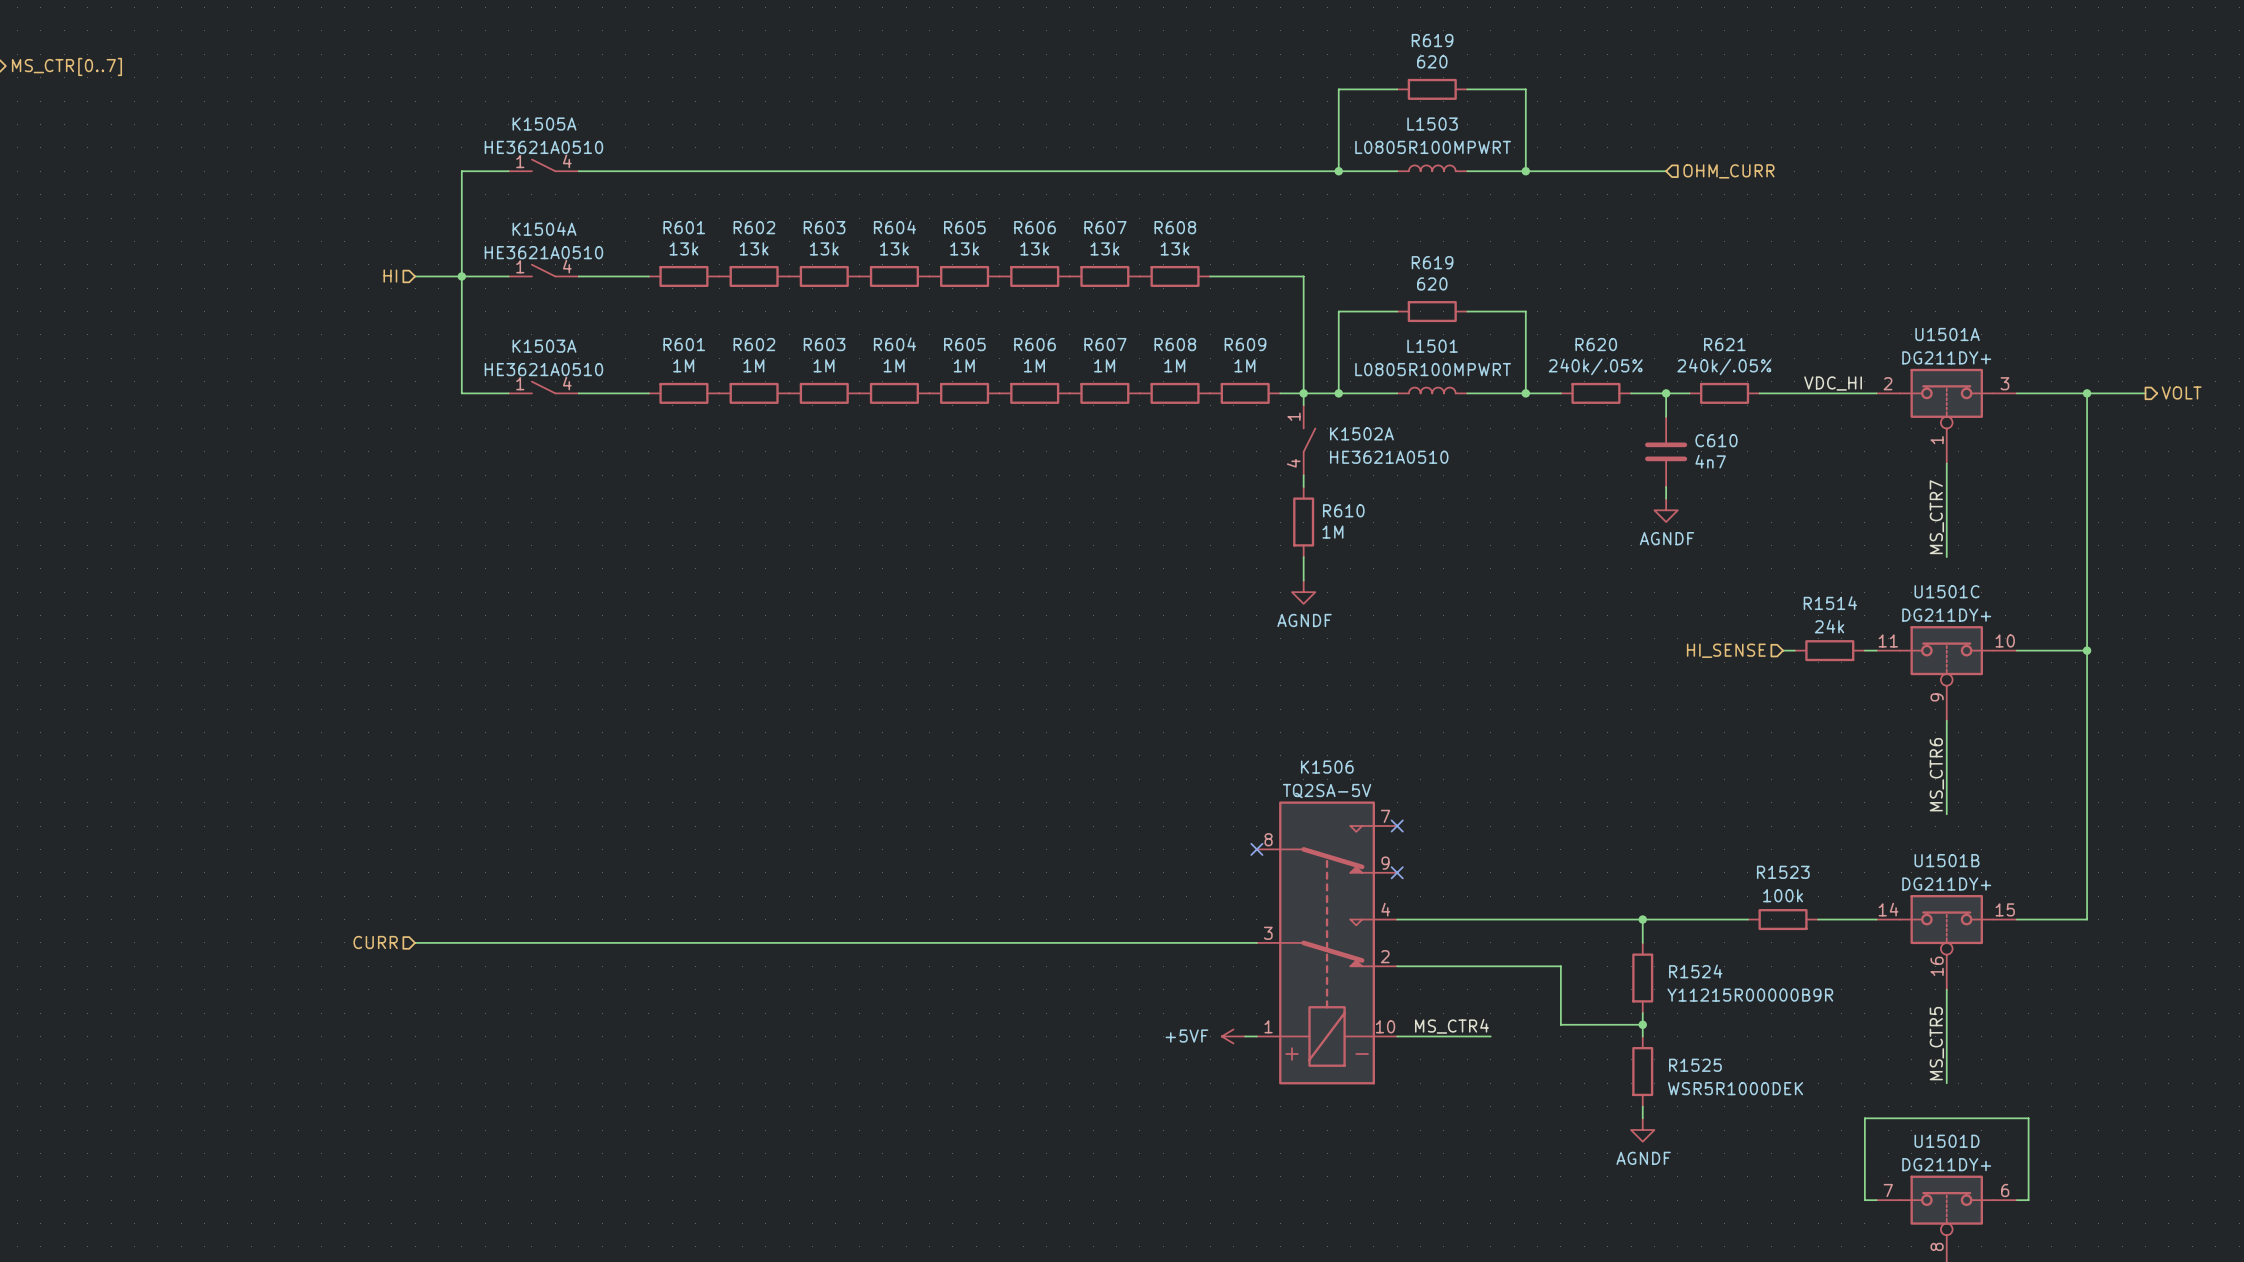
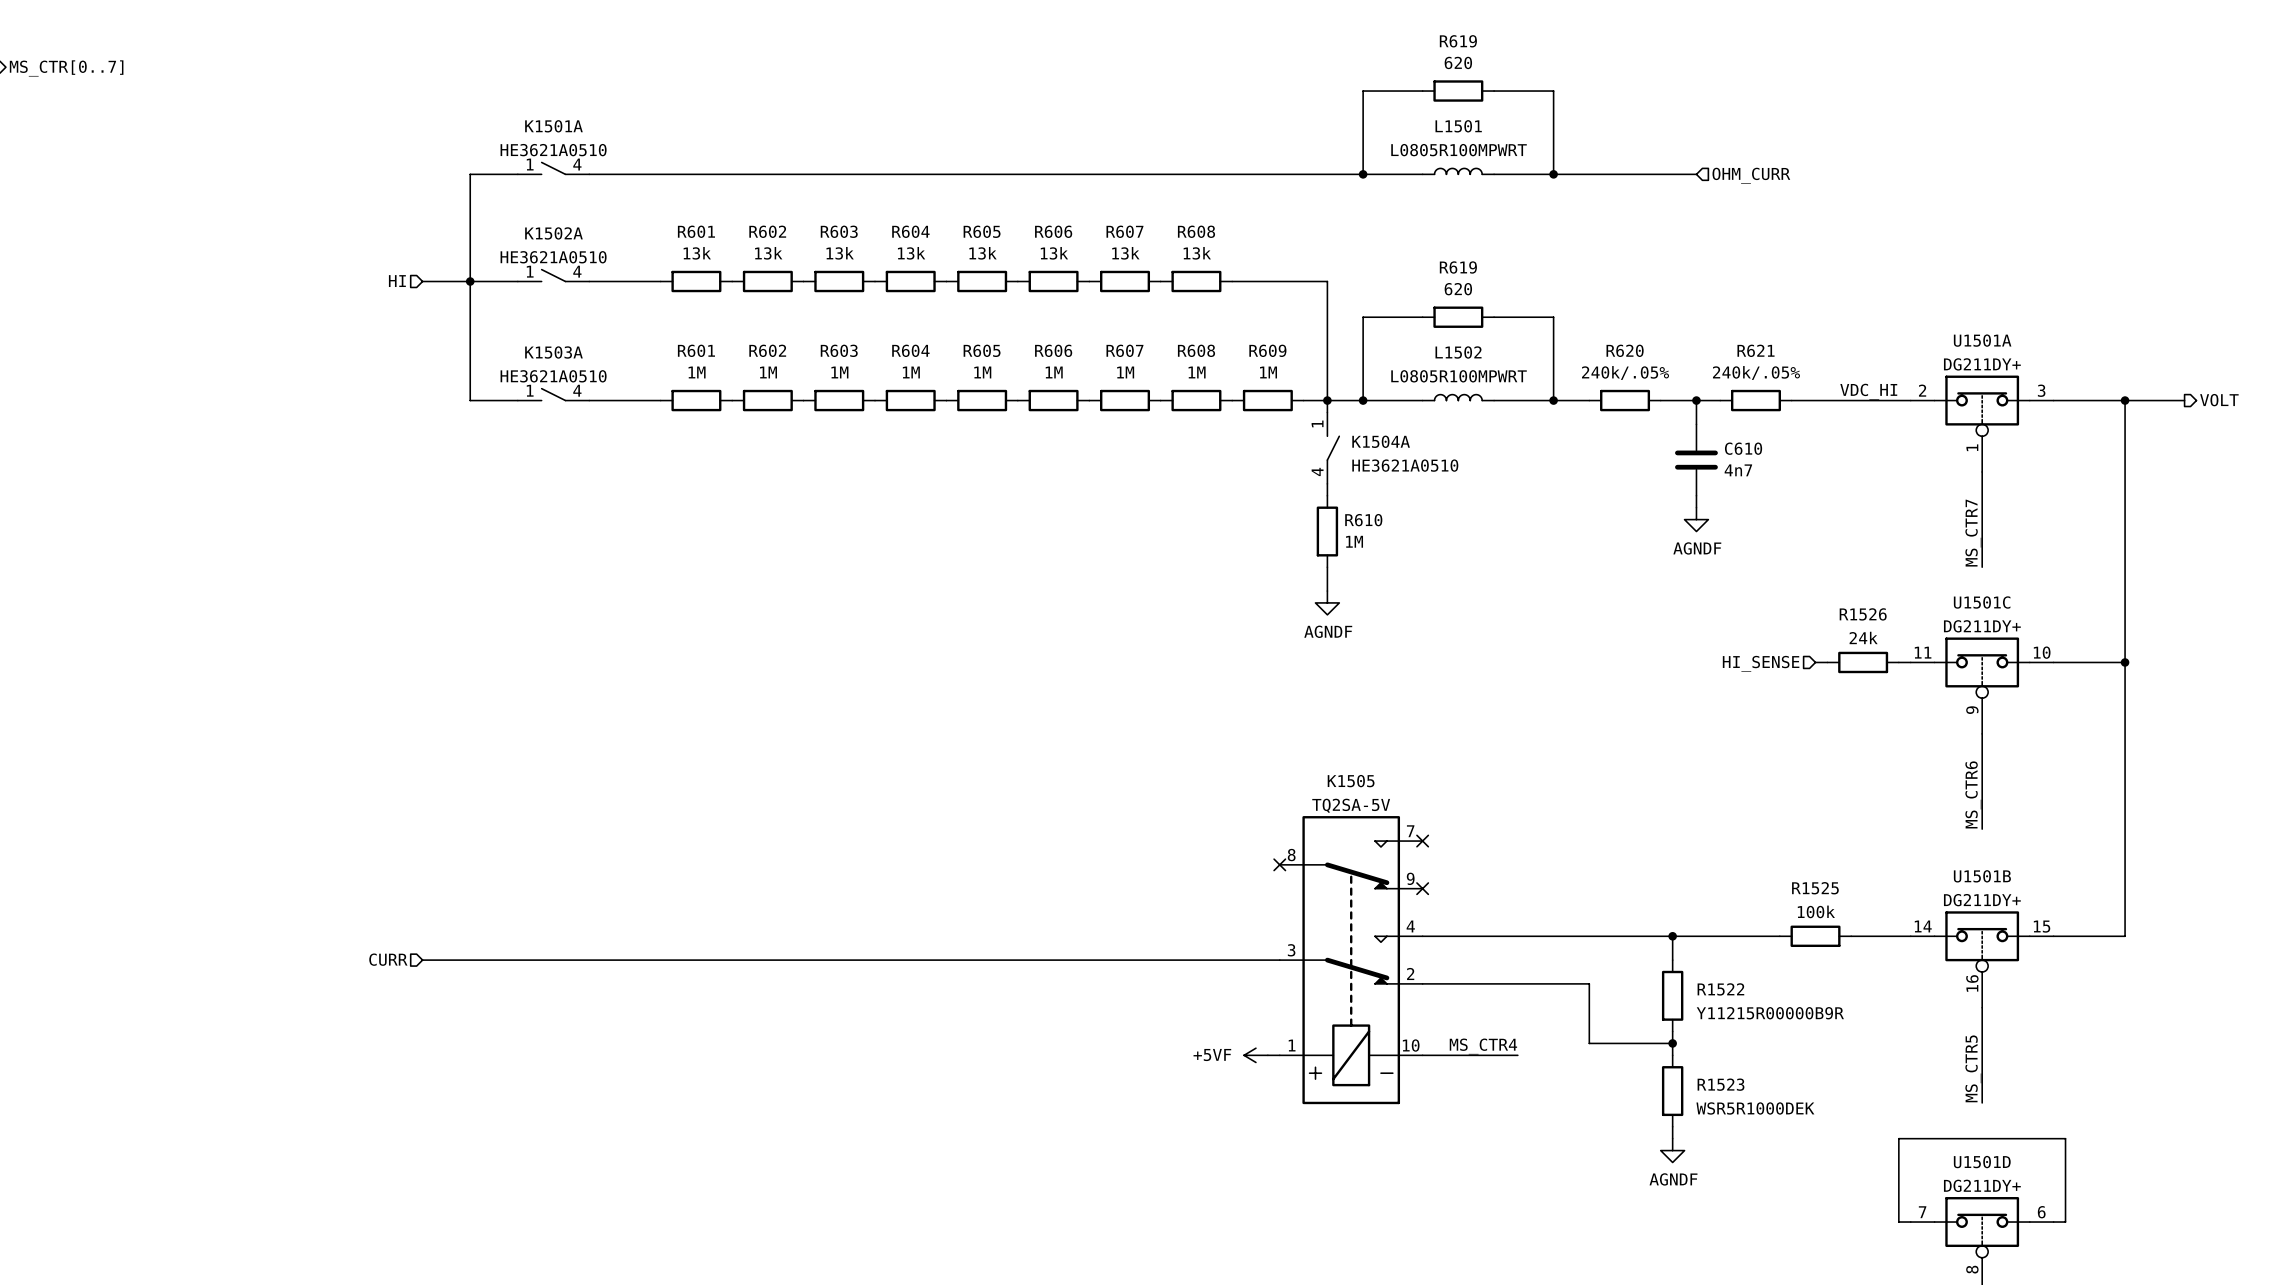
K1505A name: K1505A (544, 124) -> K1501A (553, 126)
L1503 name: L1503 (1432, 124) -> L1501 (1458, 126)
K1504A name: K1504A (544, 228) -> K1502A (553, 233)
L1501 name: L1501 (1432, 346) -> L1502 (1458, 352)
K1502A name: K1502A (1361, 433) -> K1504A (1381, 441)
R1514 name: R1514 (1830, 603) -> R1526 (1863, 614)
K1506 name: K1506 (1327, 767) -> K1505 (1351, 781)
R1523 name: R1523 (1783, 872) -> R1525 (1815, 888)
R1524 name: R1524 (1695, 971) -> R1522 (1720, 989)
R1525 name: R1525 (1695, 1065) -> R1523 (1721, 1084)

